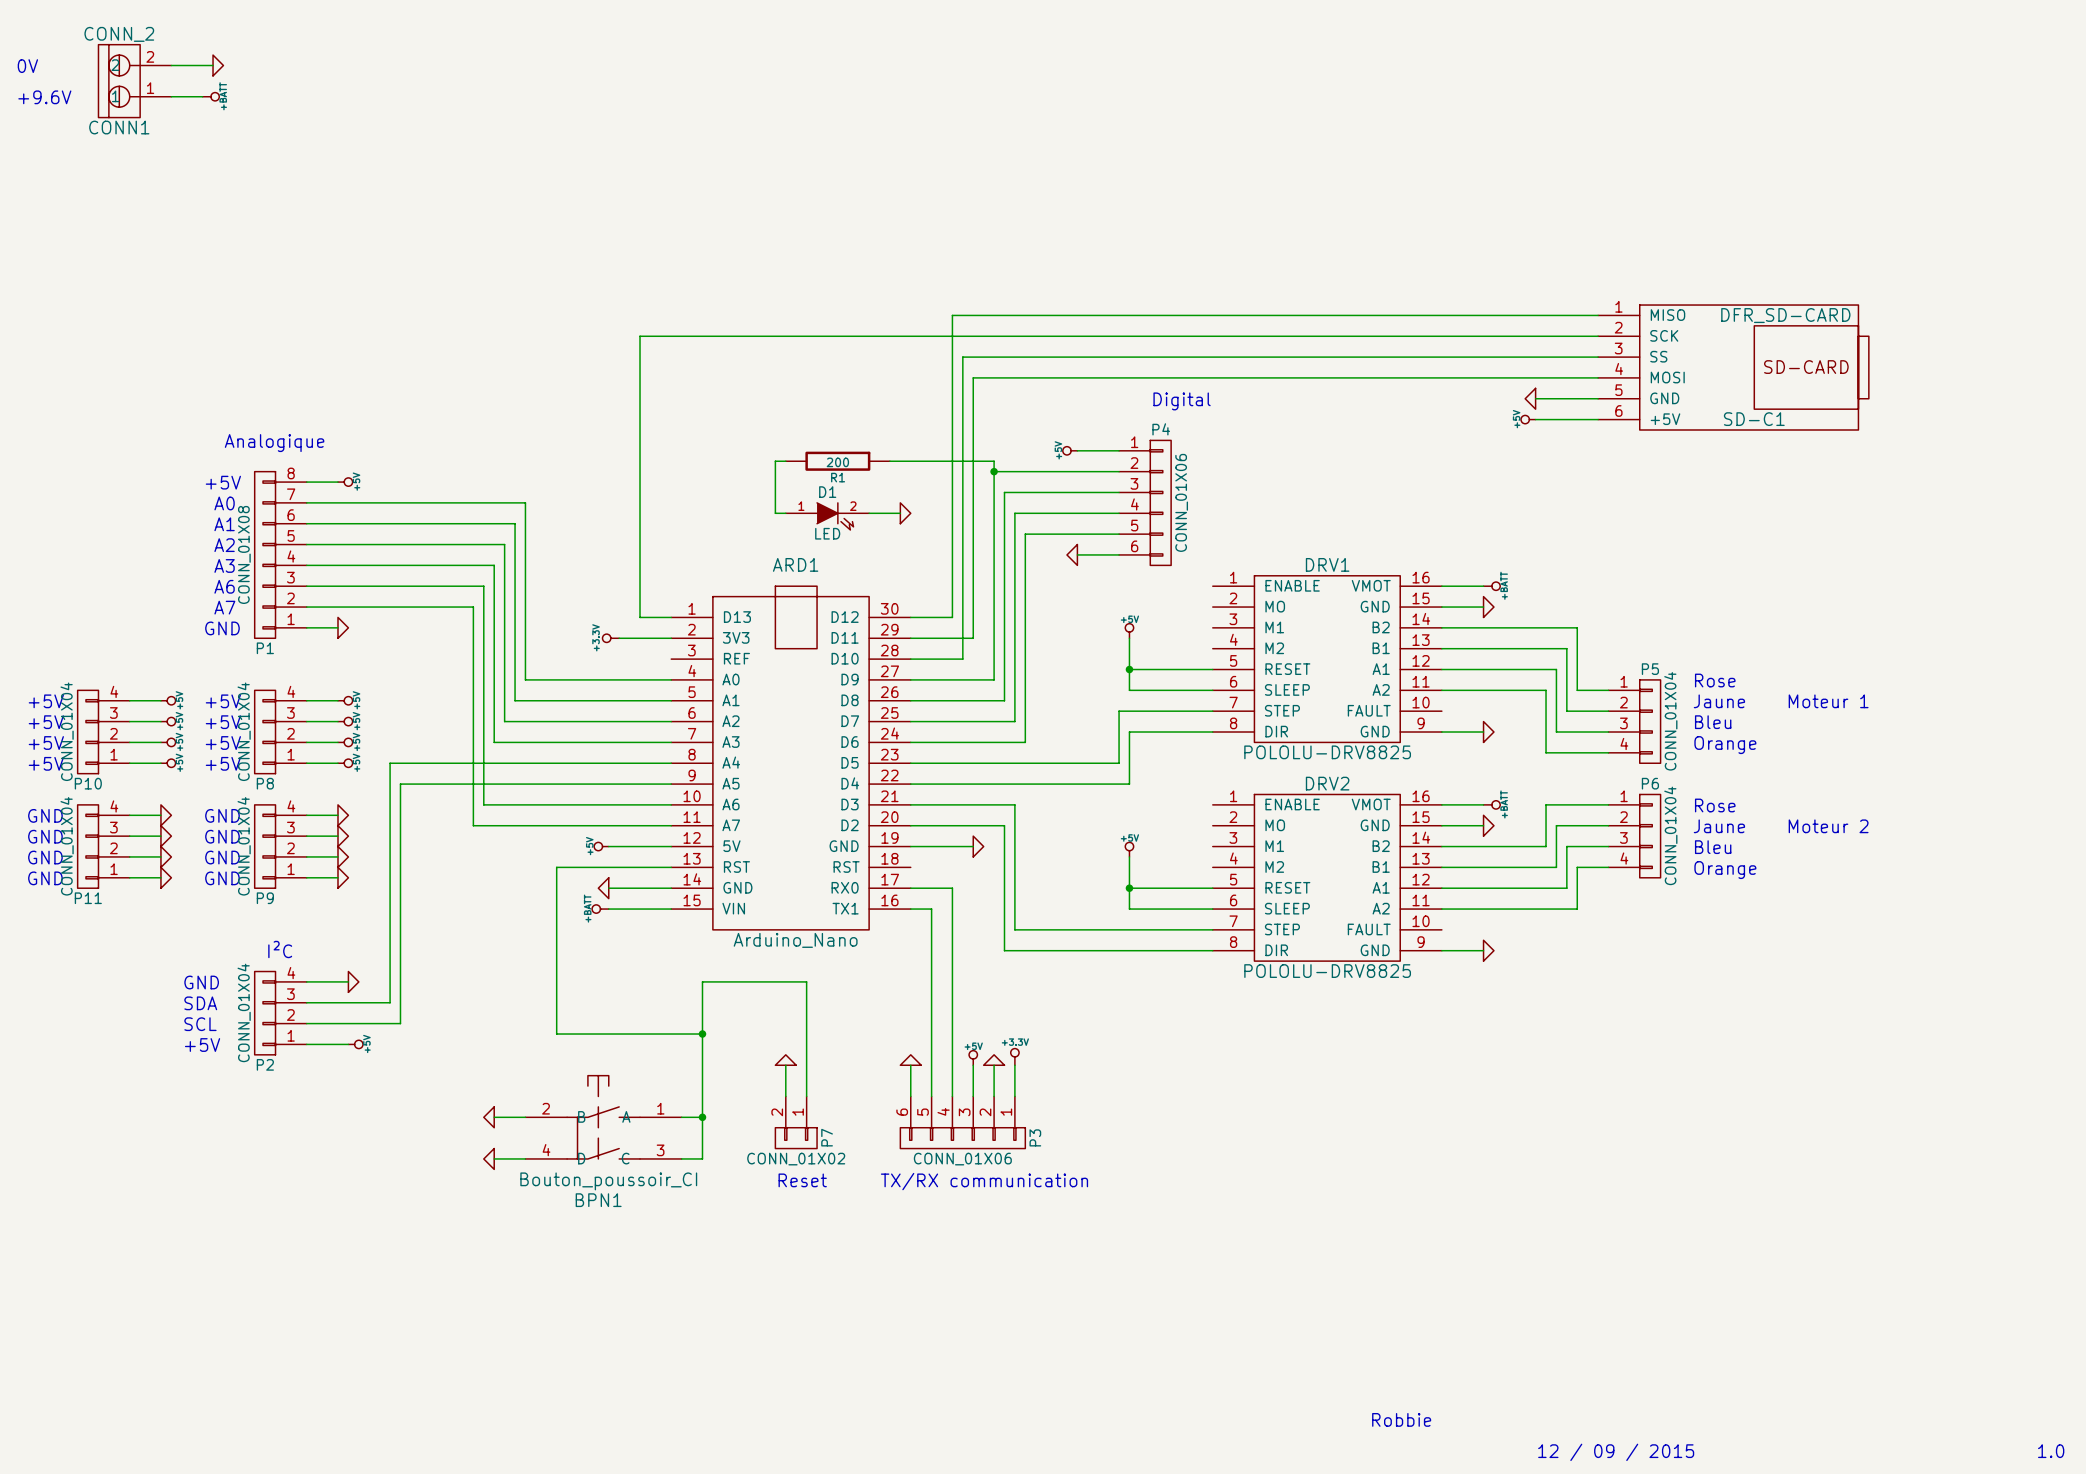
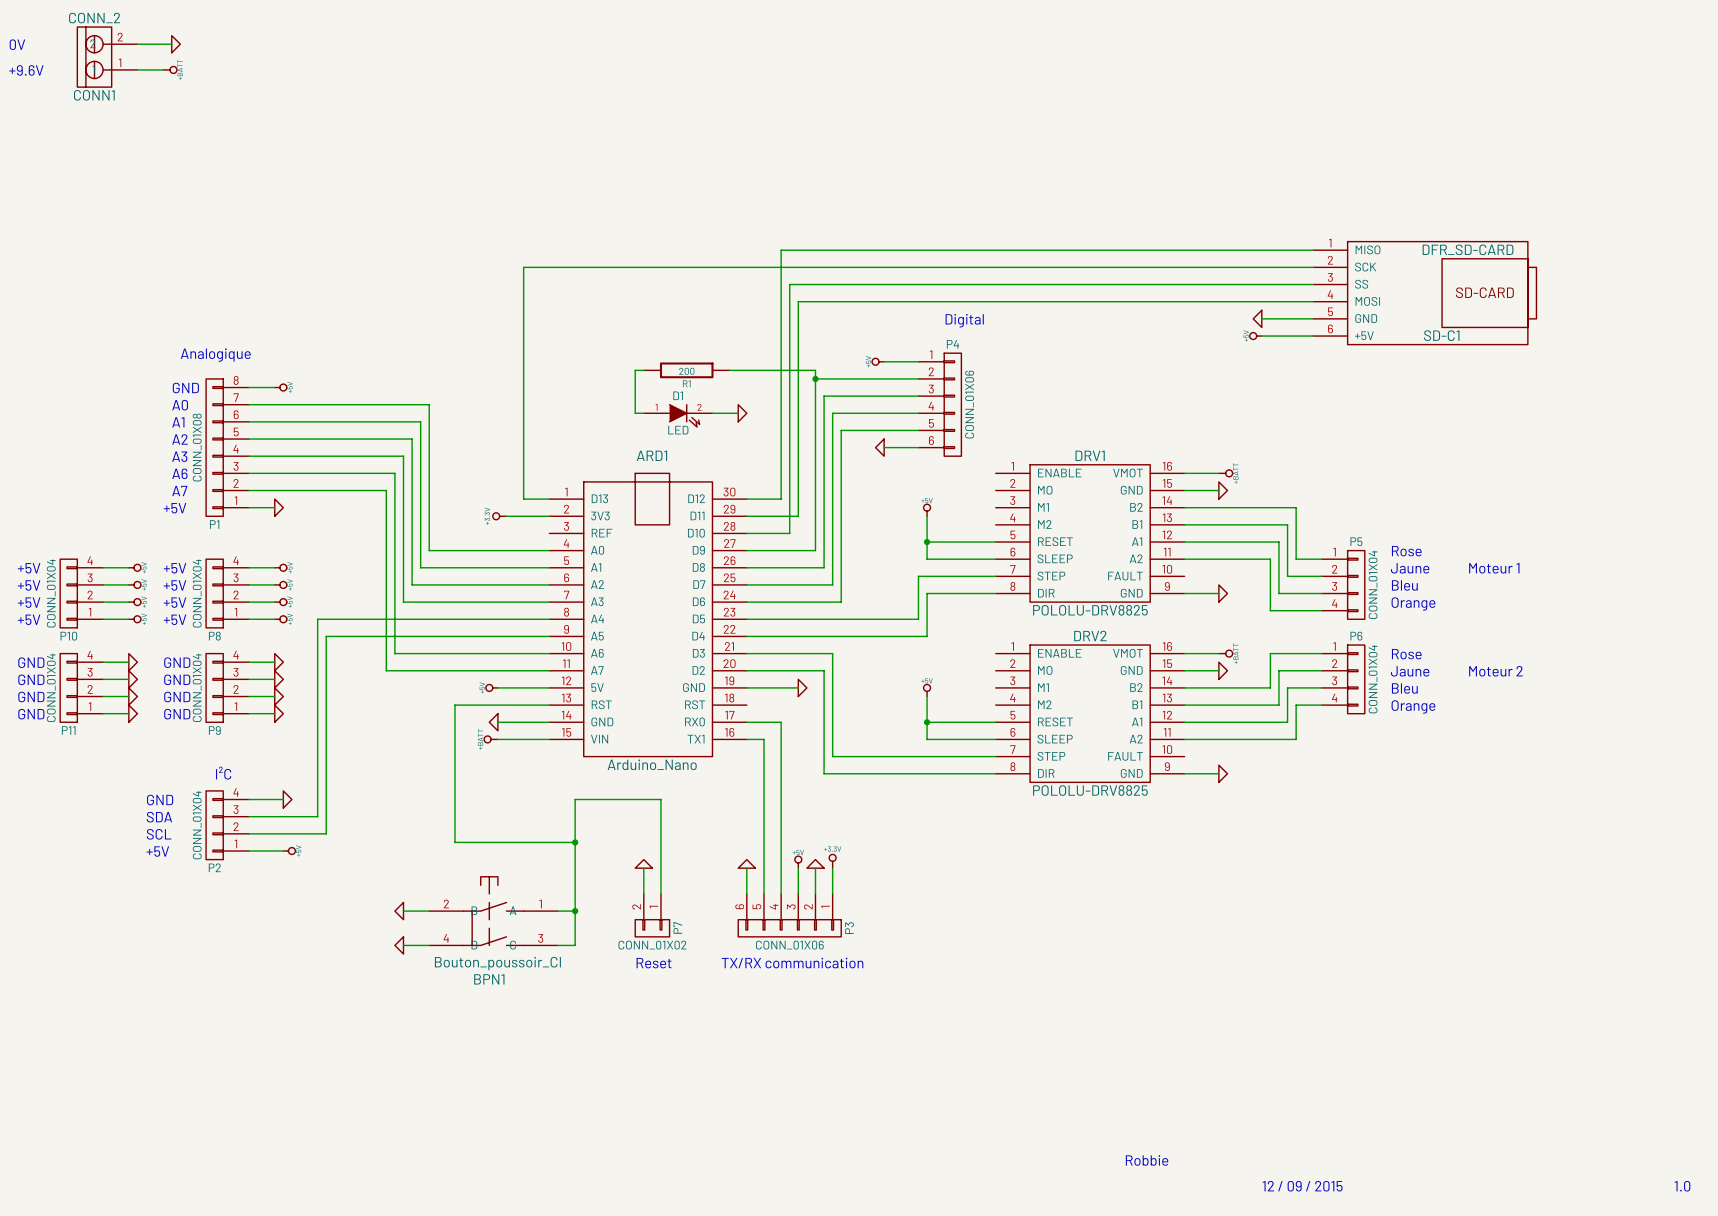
text: +5V (223, 482) -> none
text: none -> GND (185, 388)
text: GND (222, 628) -> +5V (175, 508)

